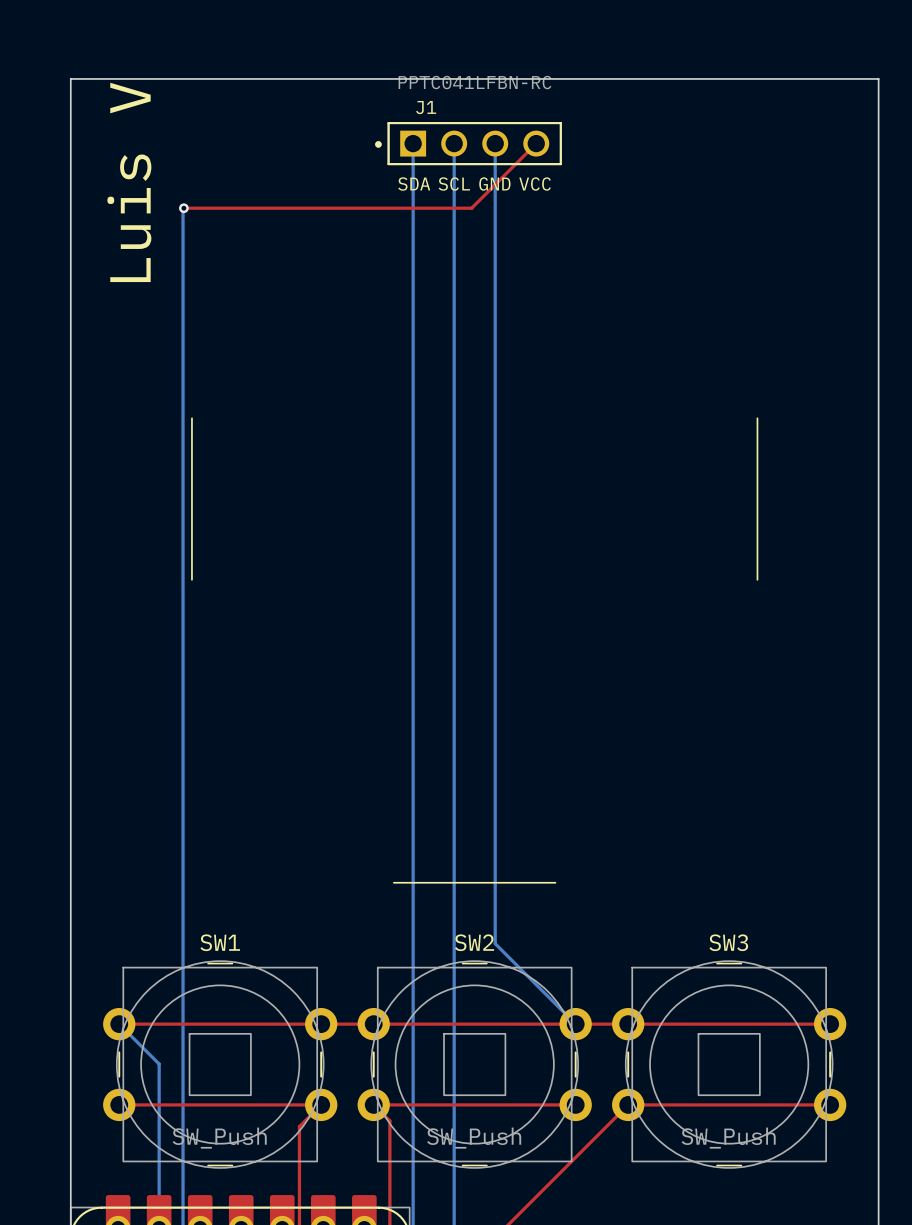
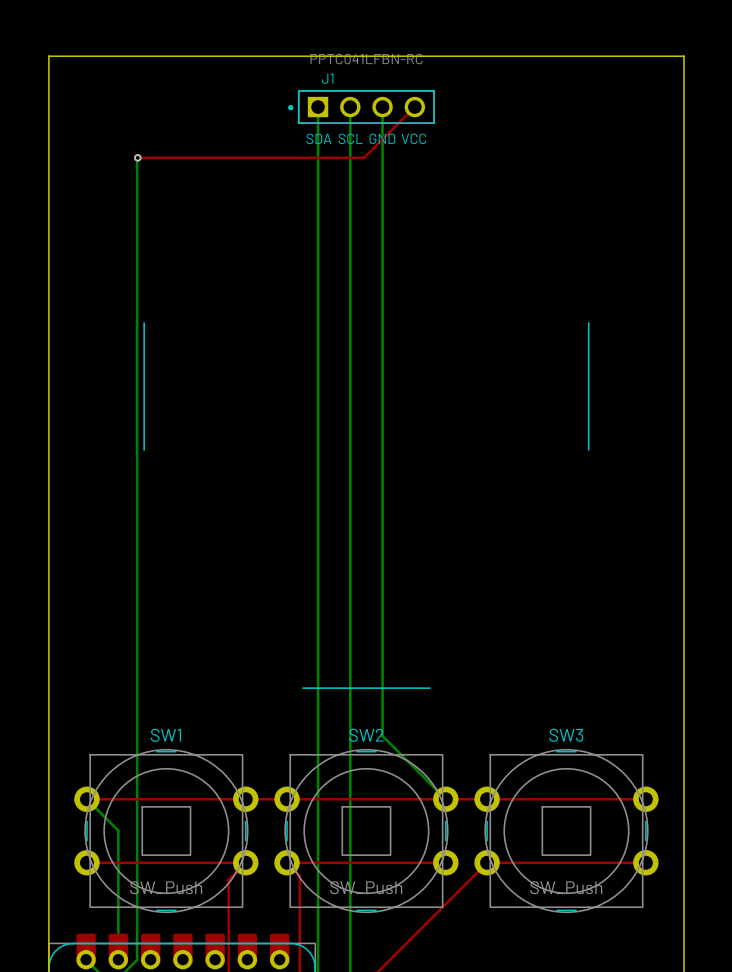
text: Luis V (129, 182) -> none

